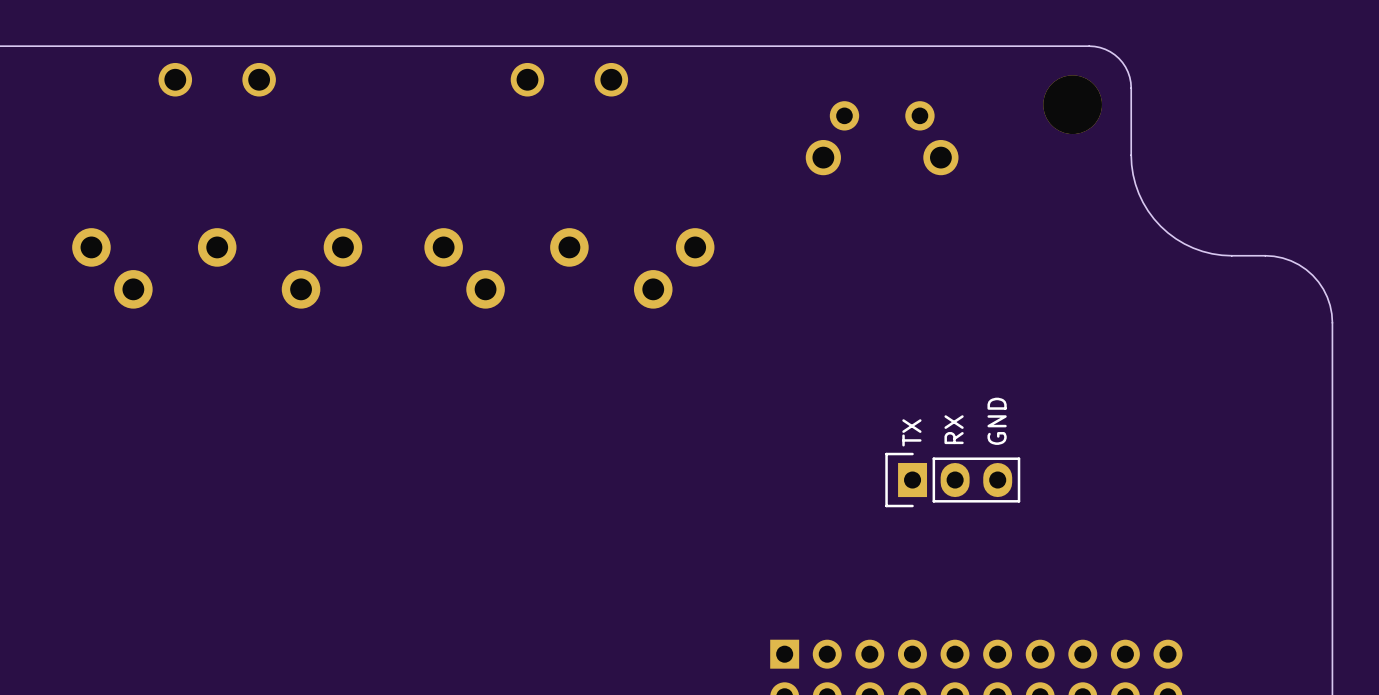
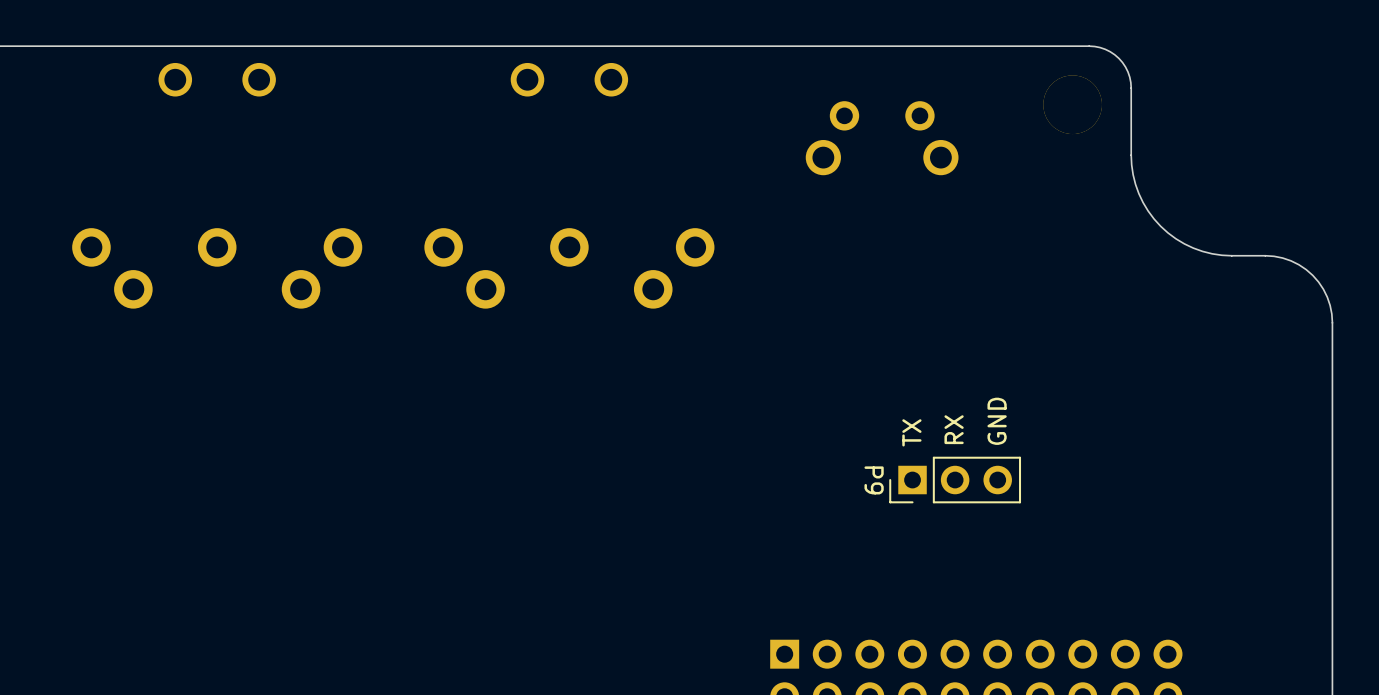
part: (952, 480) -> none
P9: none -> (955, 480)

